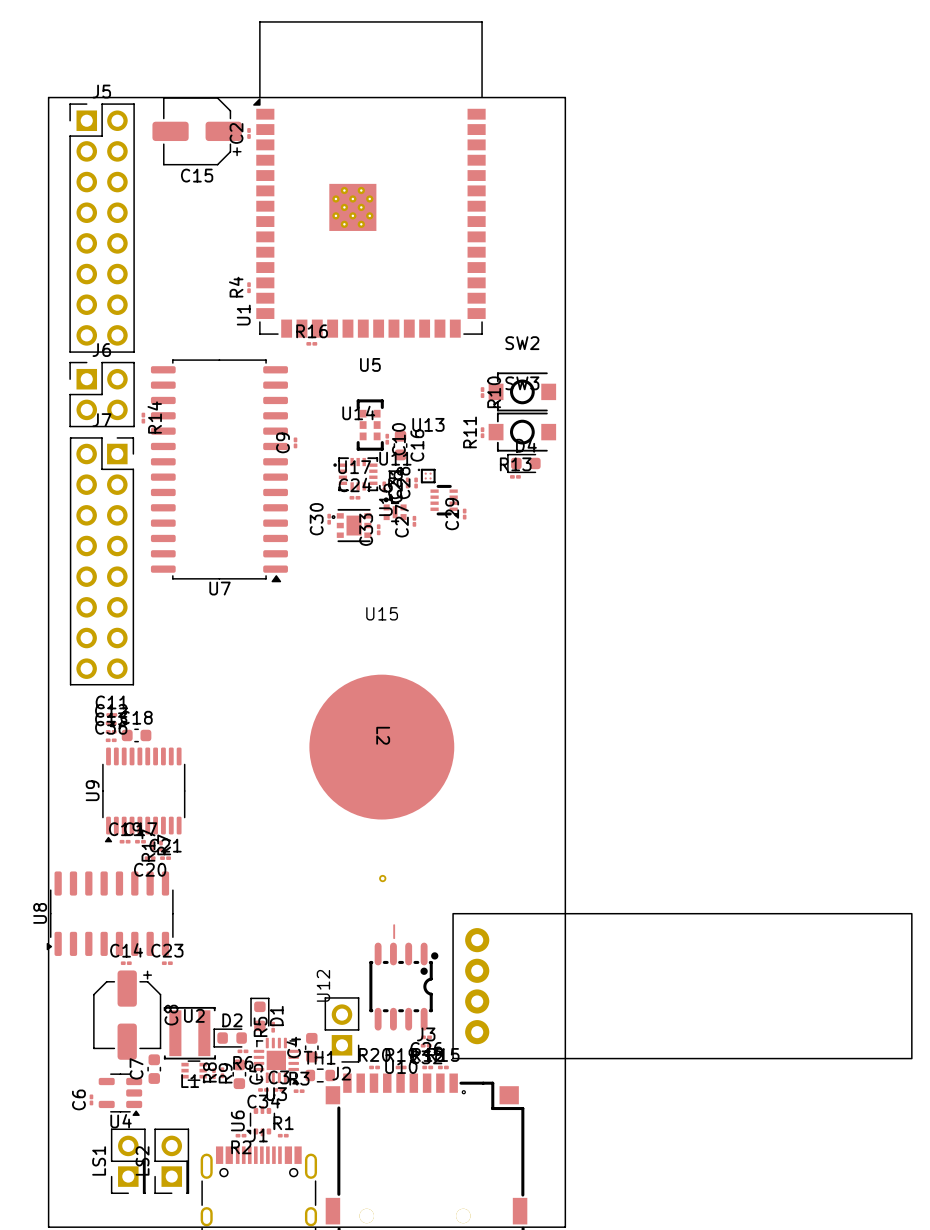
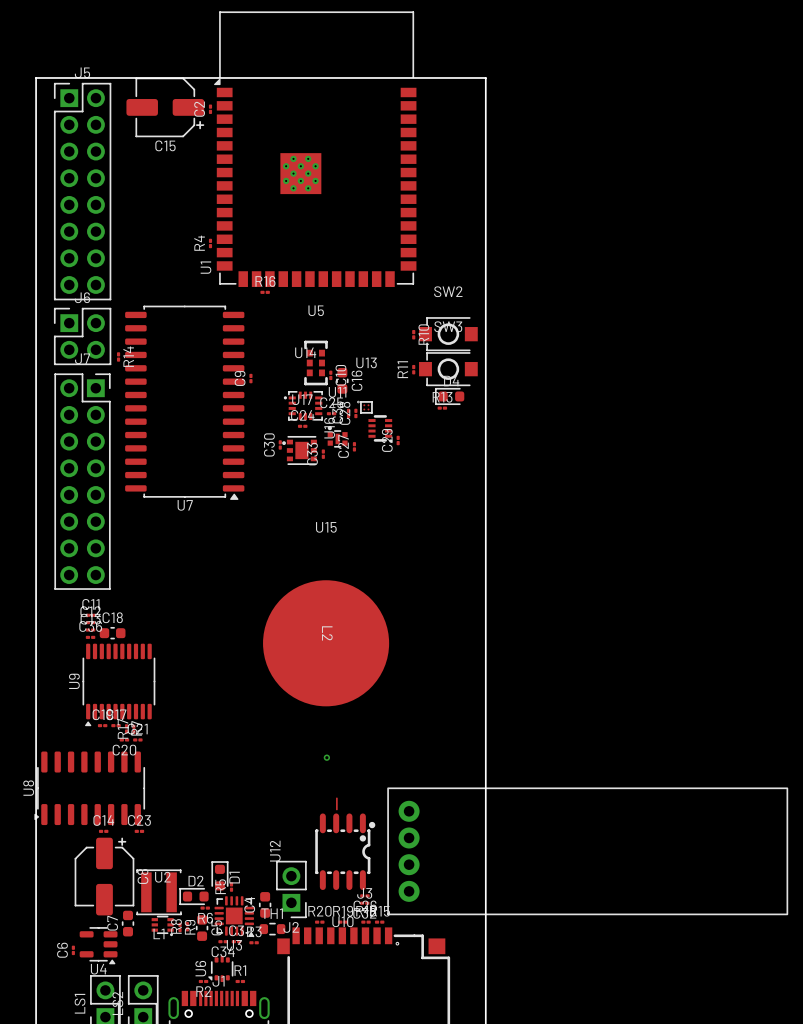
C25 rotation: 0° (384, 486) -> 90° clockwise (331, 413)

